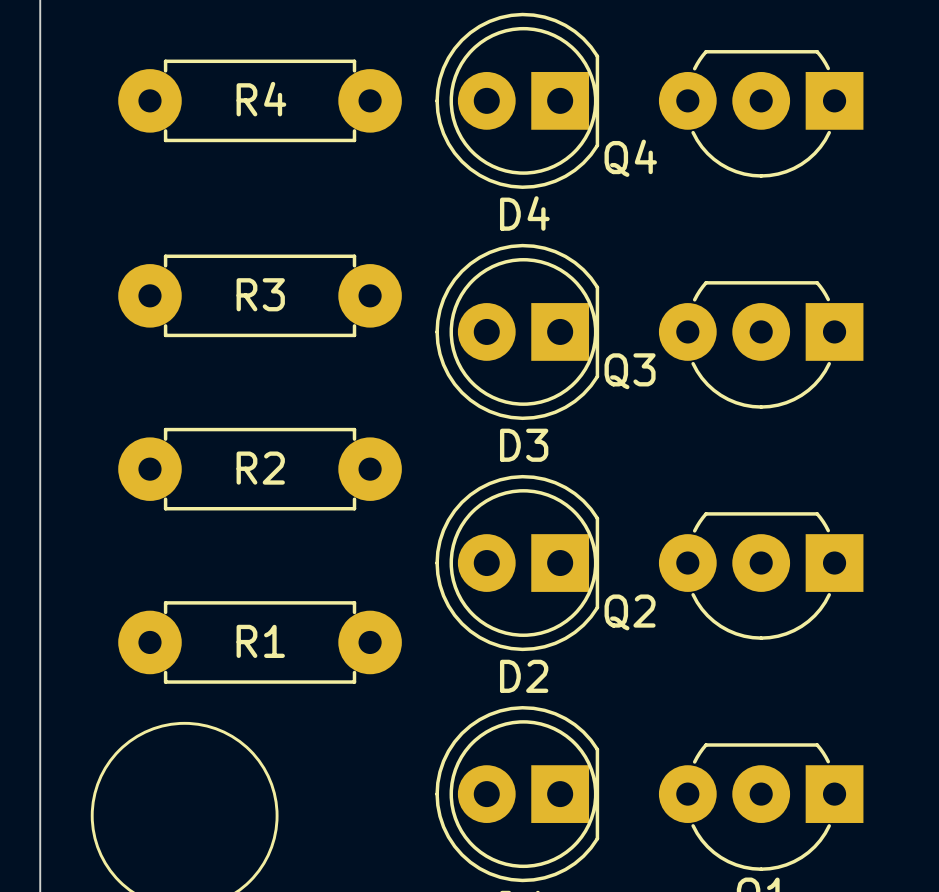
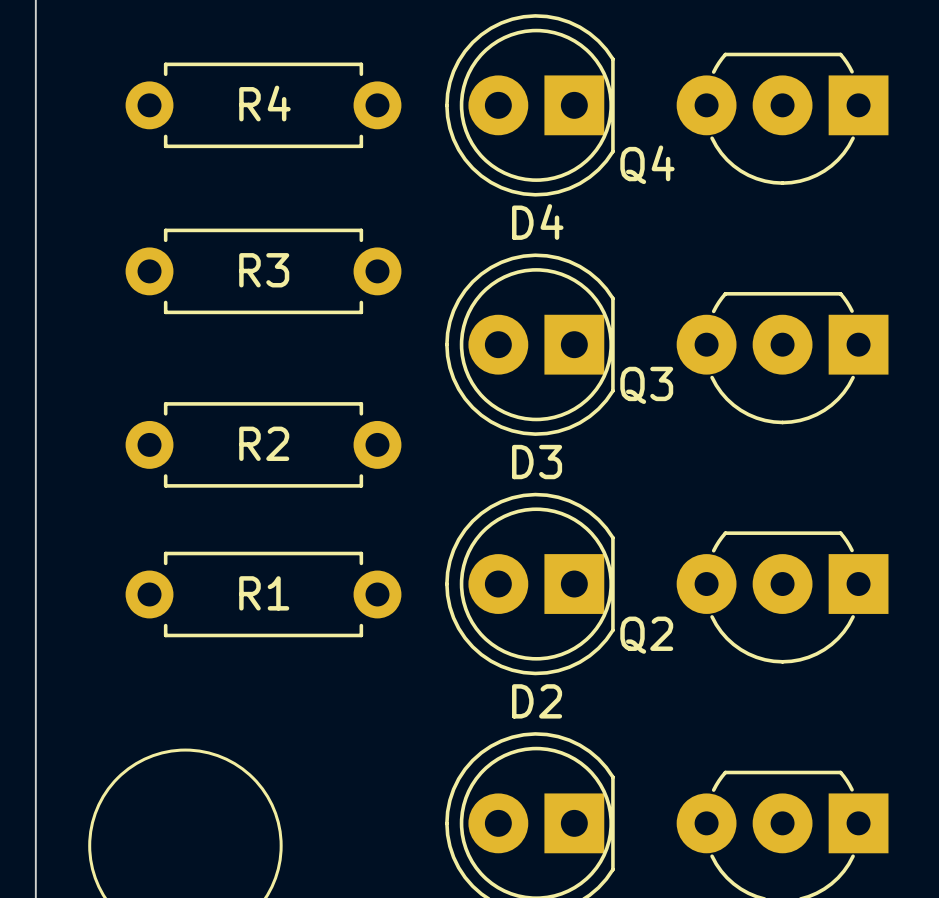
R4 footprint: [118, 59, 402, 143] -> [125, 62, 402, 149]
R3 footprint: [118, 254, 402, 338] -> [125, 228, 402, 315]
R2 footprint: [118, 427, 402, 511] -> [125, 402, 402, 488]
R1 footprint: [118, 601, 402, 684] -> [125, 551, 402, 638]

